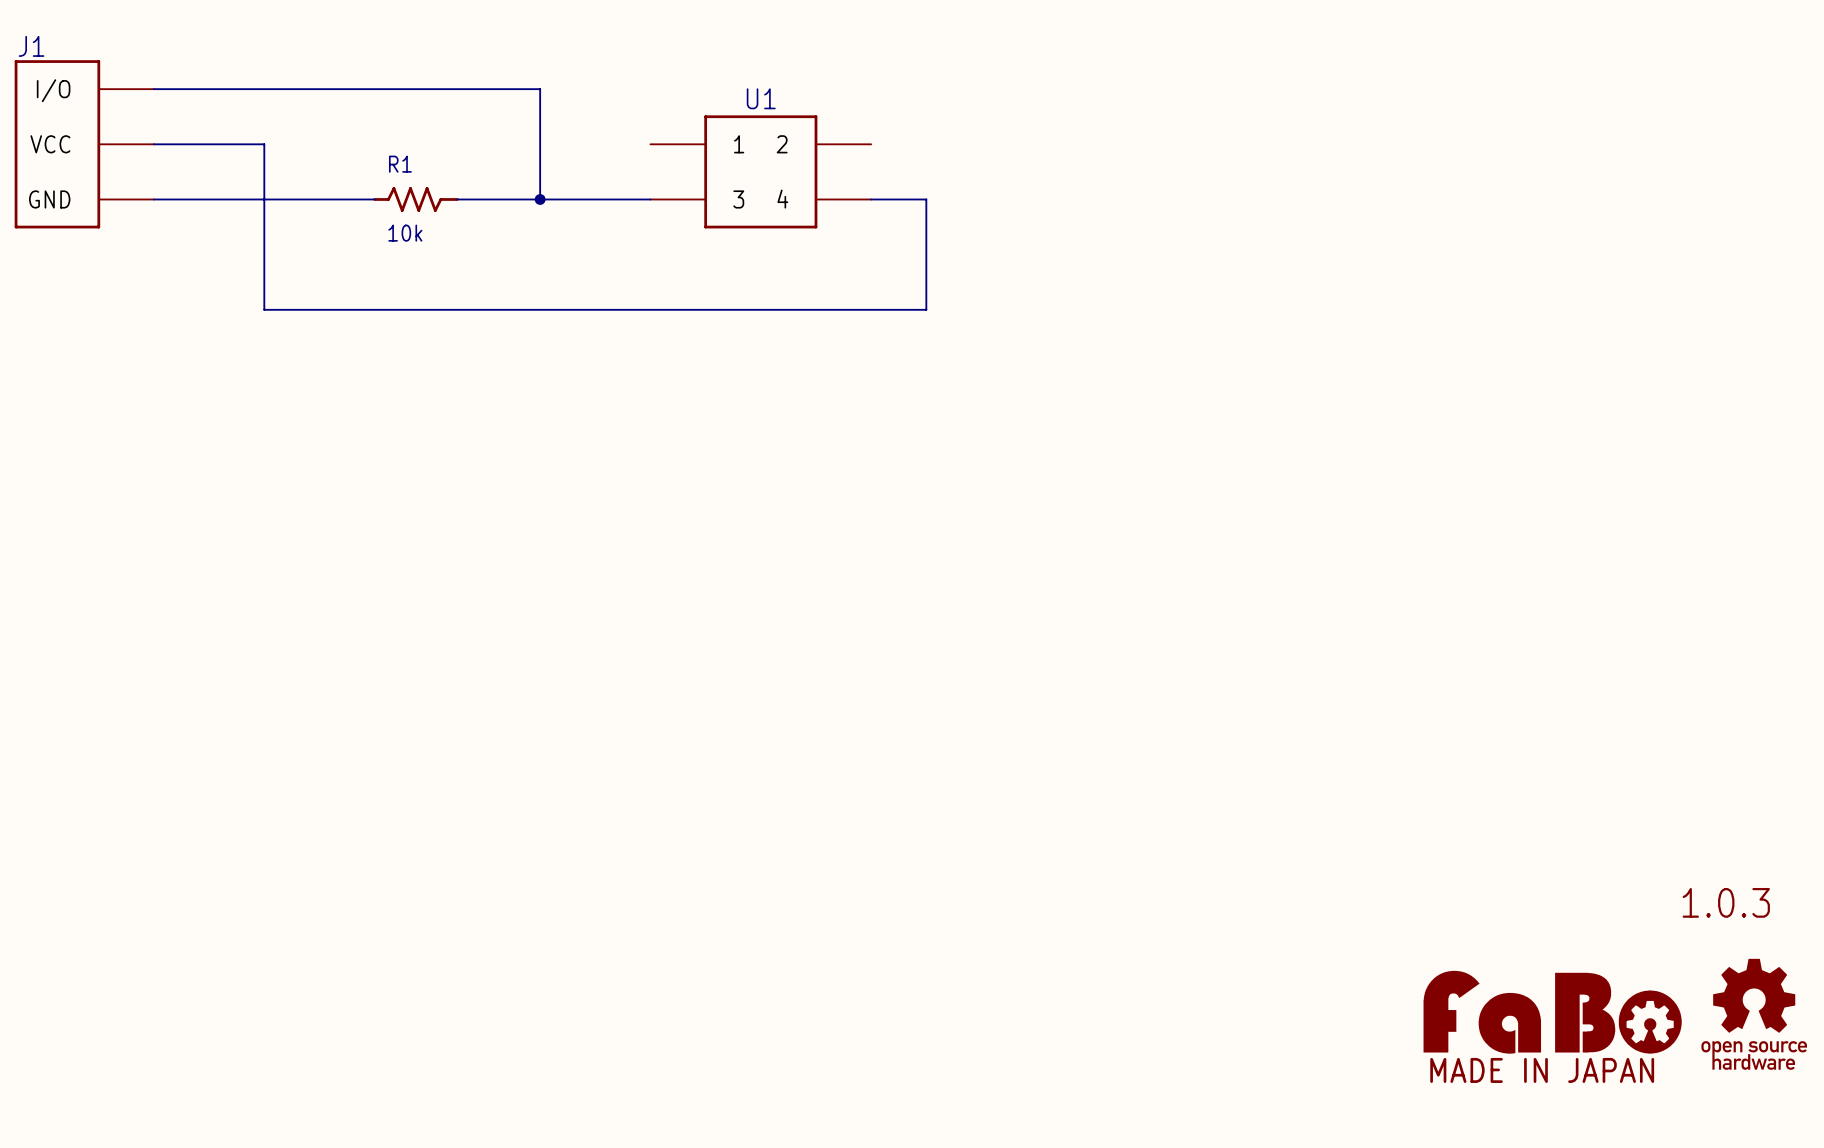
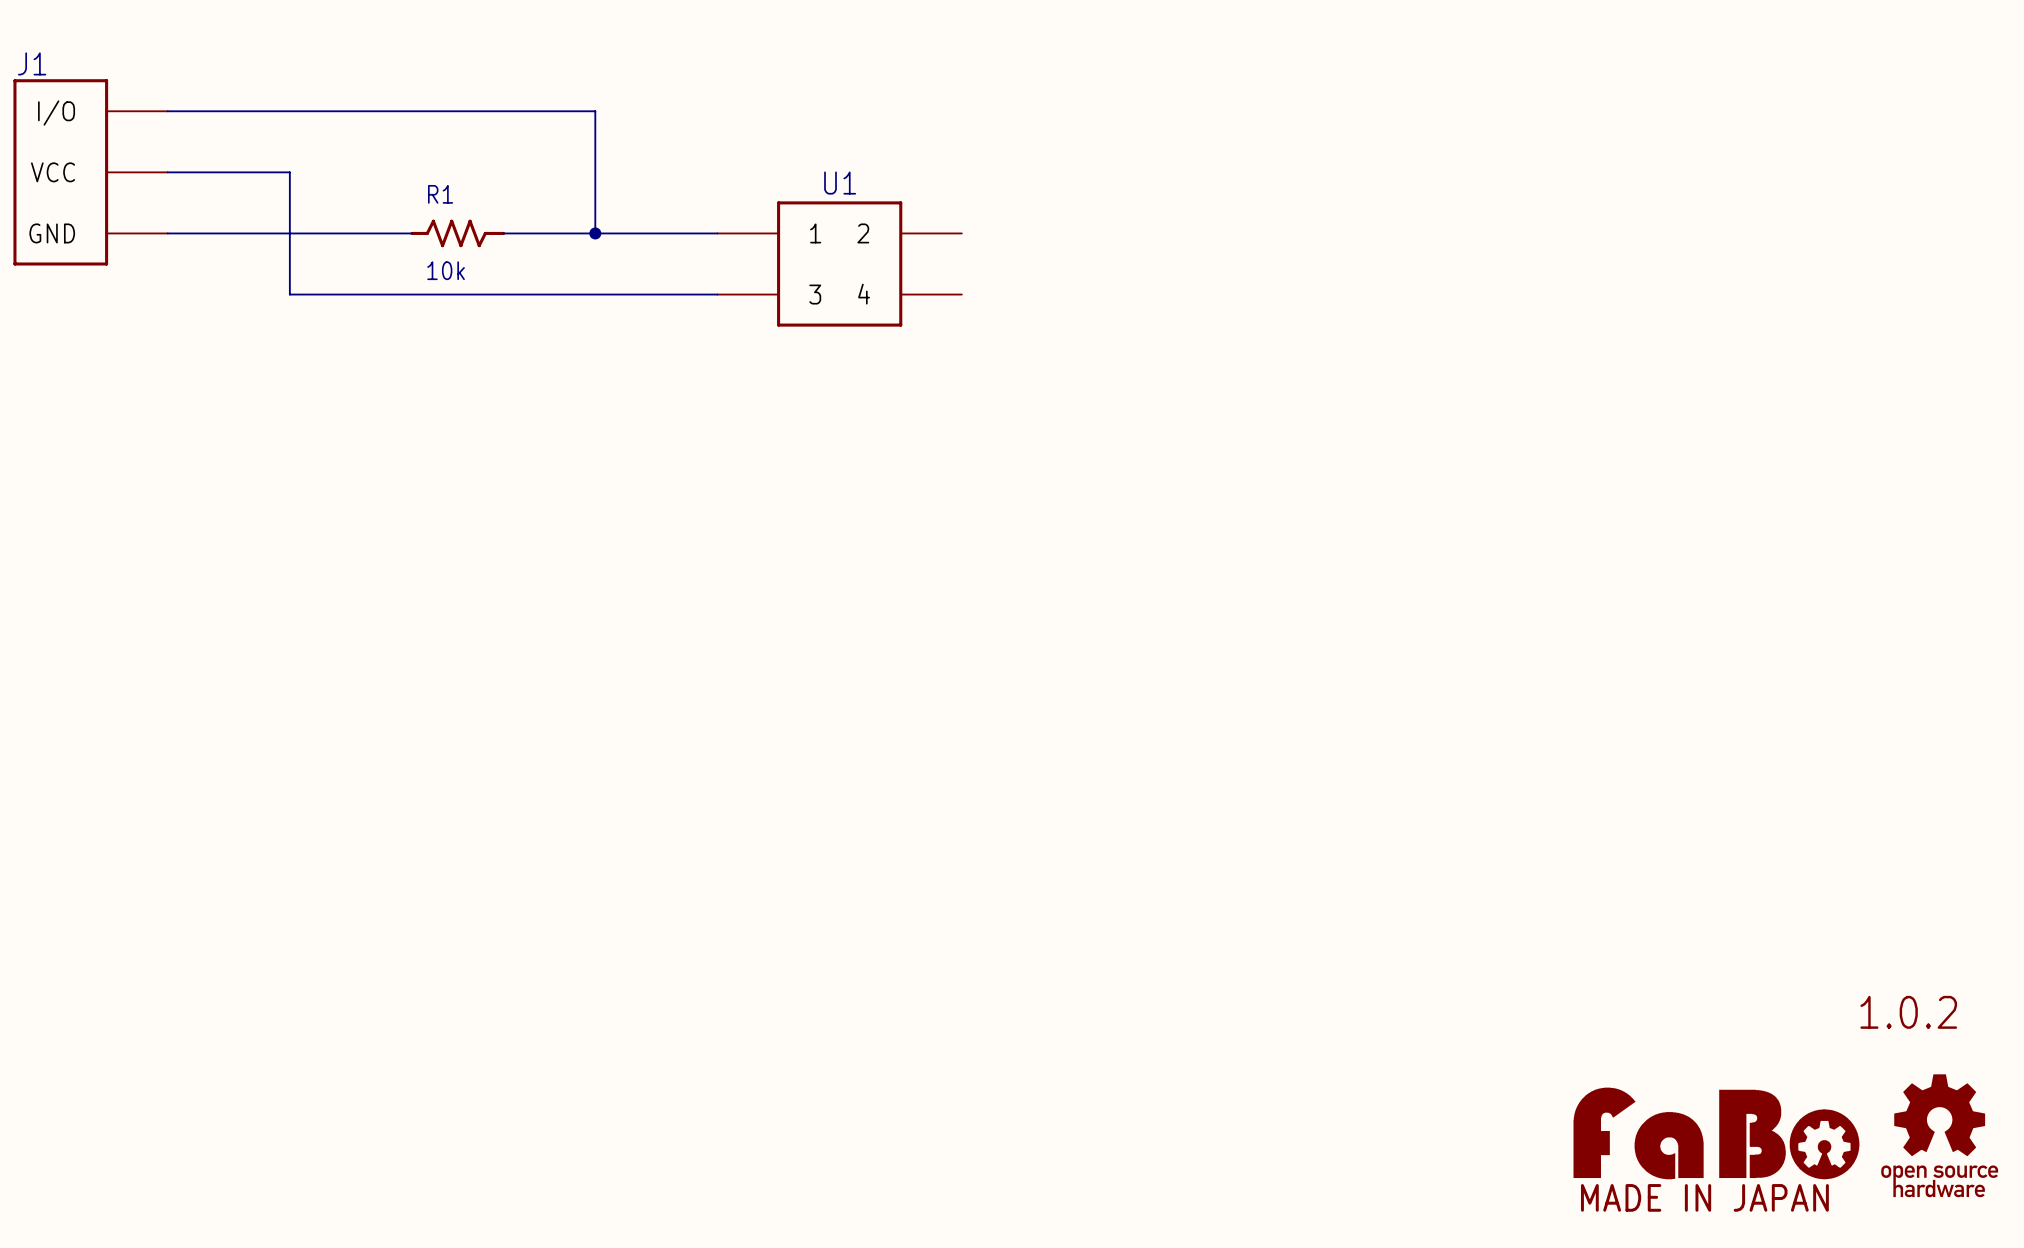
U1 position: (760, 171) -> (839, 263)
wire: (871, 199) (926, 199) (926, 309) (264, 309) (264, 254) -> (717, 294) (289, 294)
text: 1.0.3 (1726, 902) -> 1.0.2 (1908, 1012)

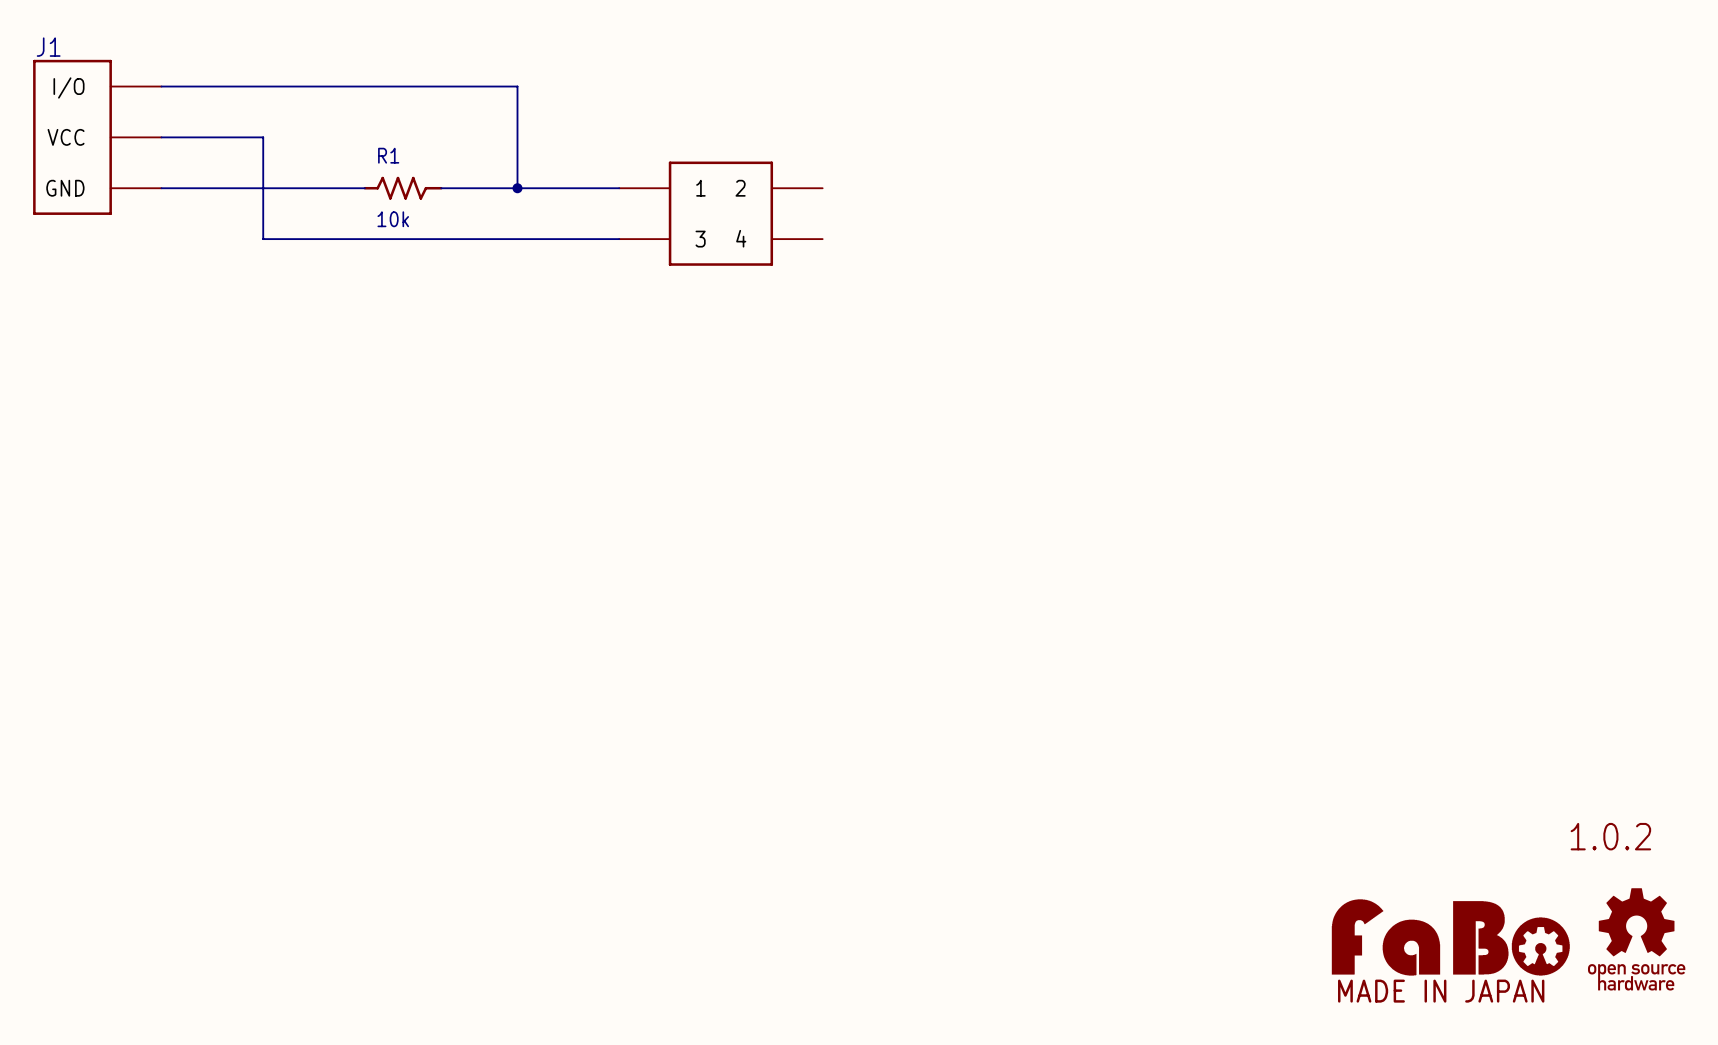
U1 name: U1 (840, 183) -> none

